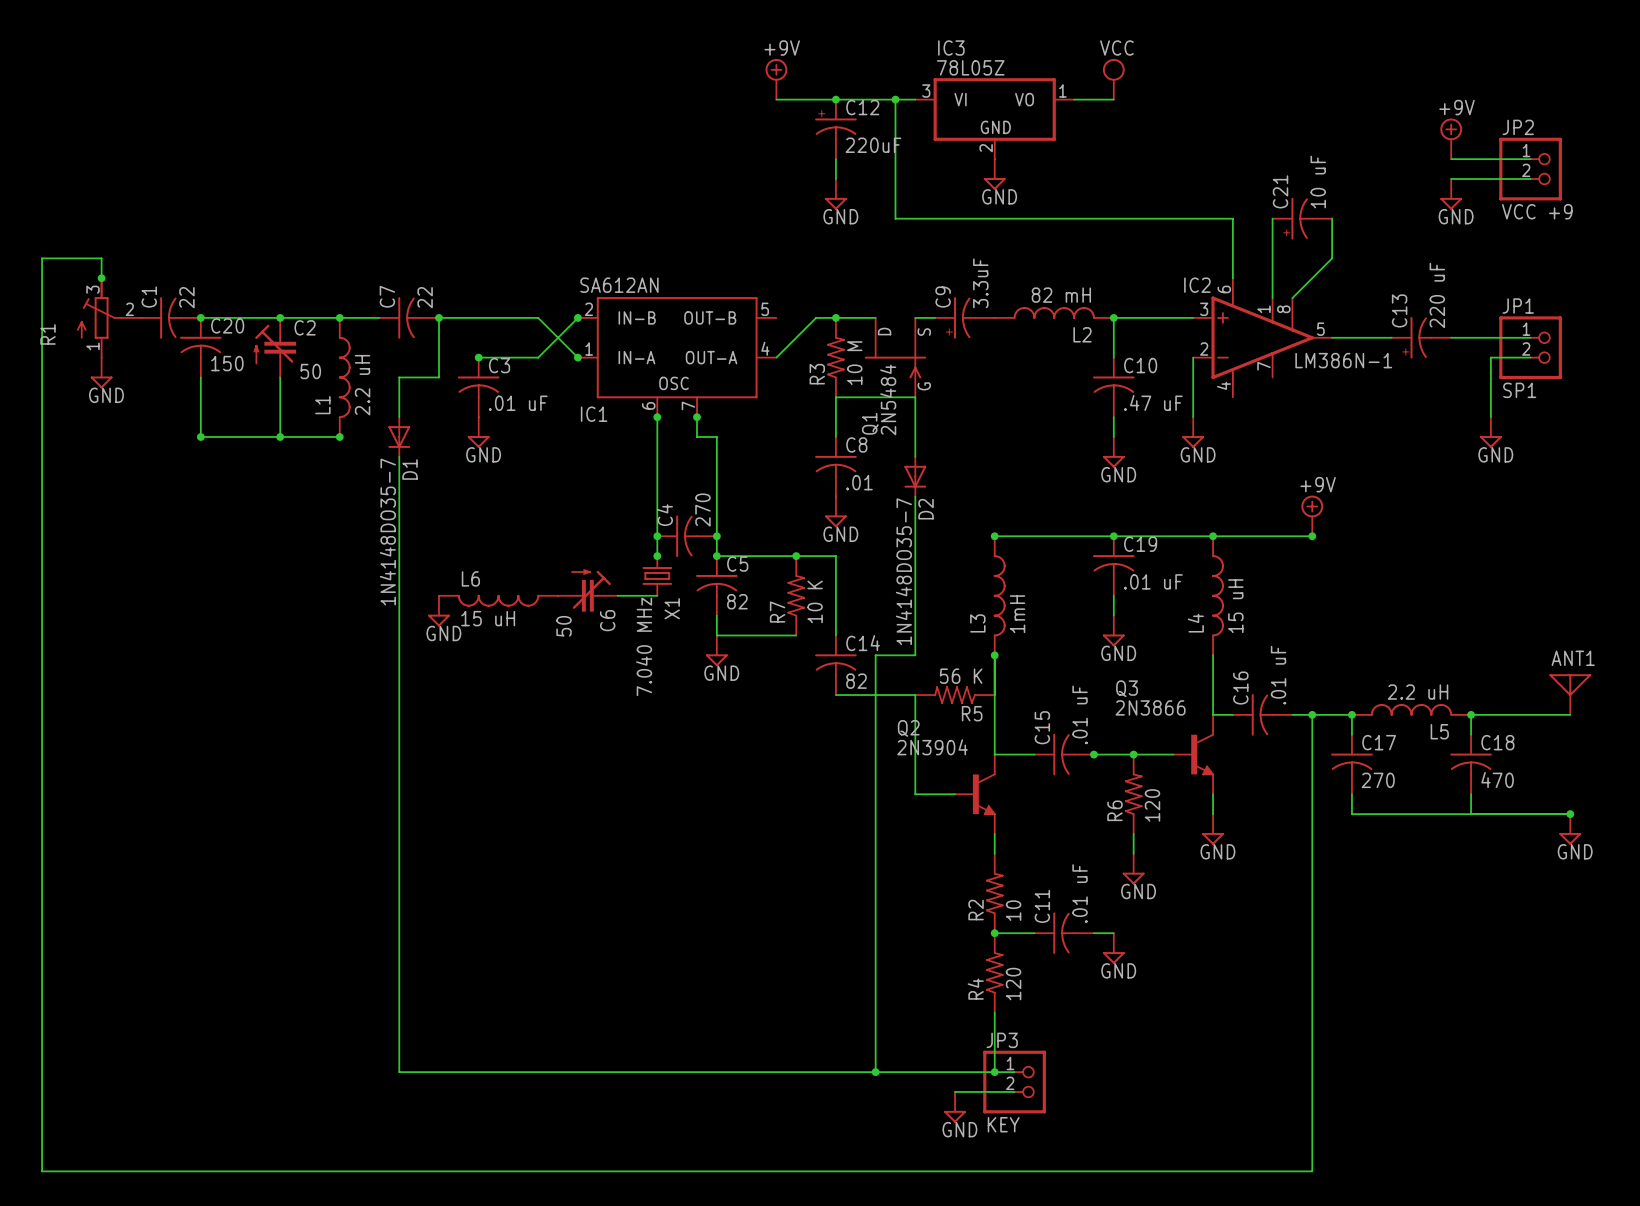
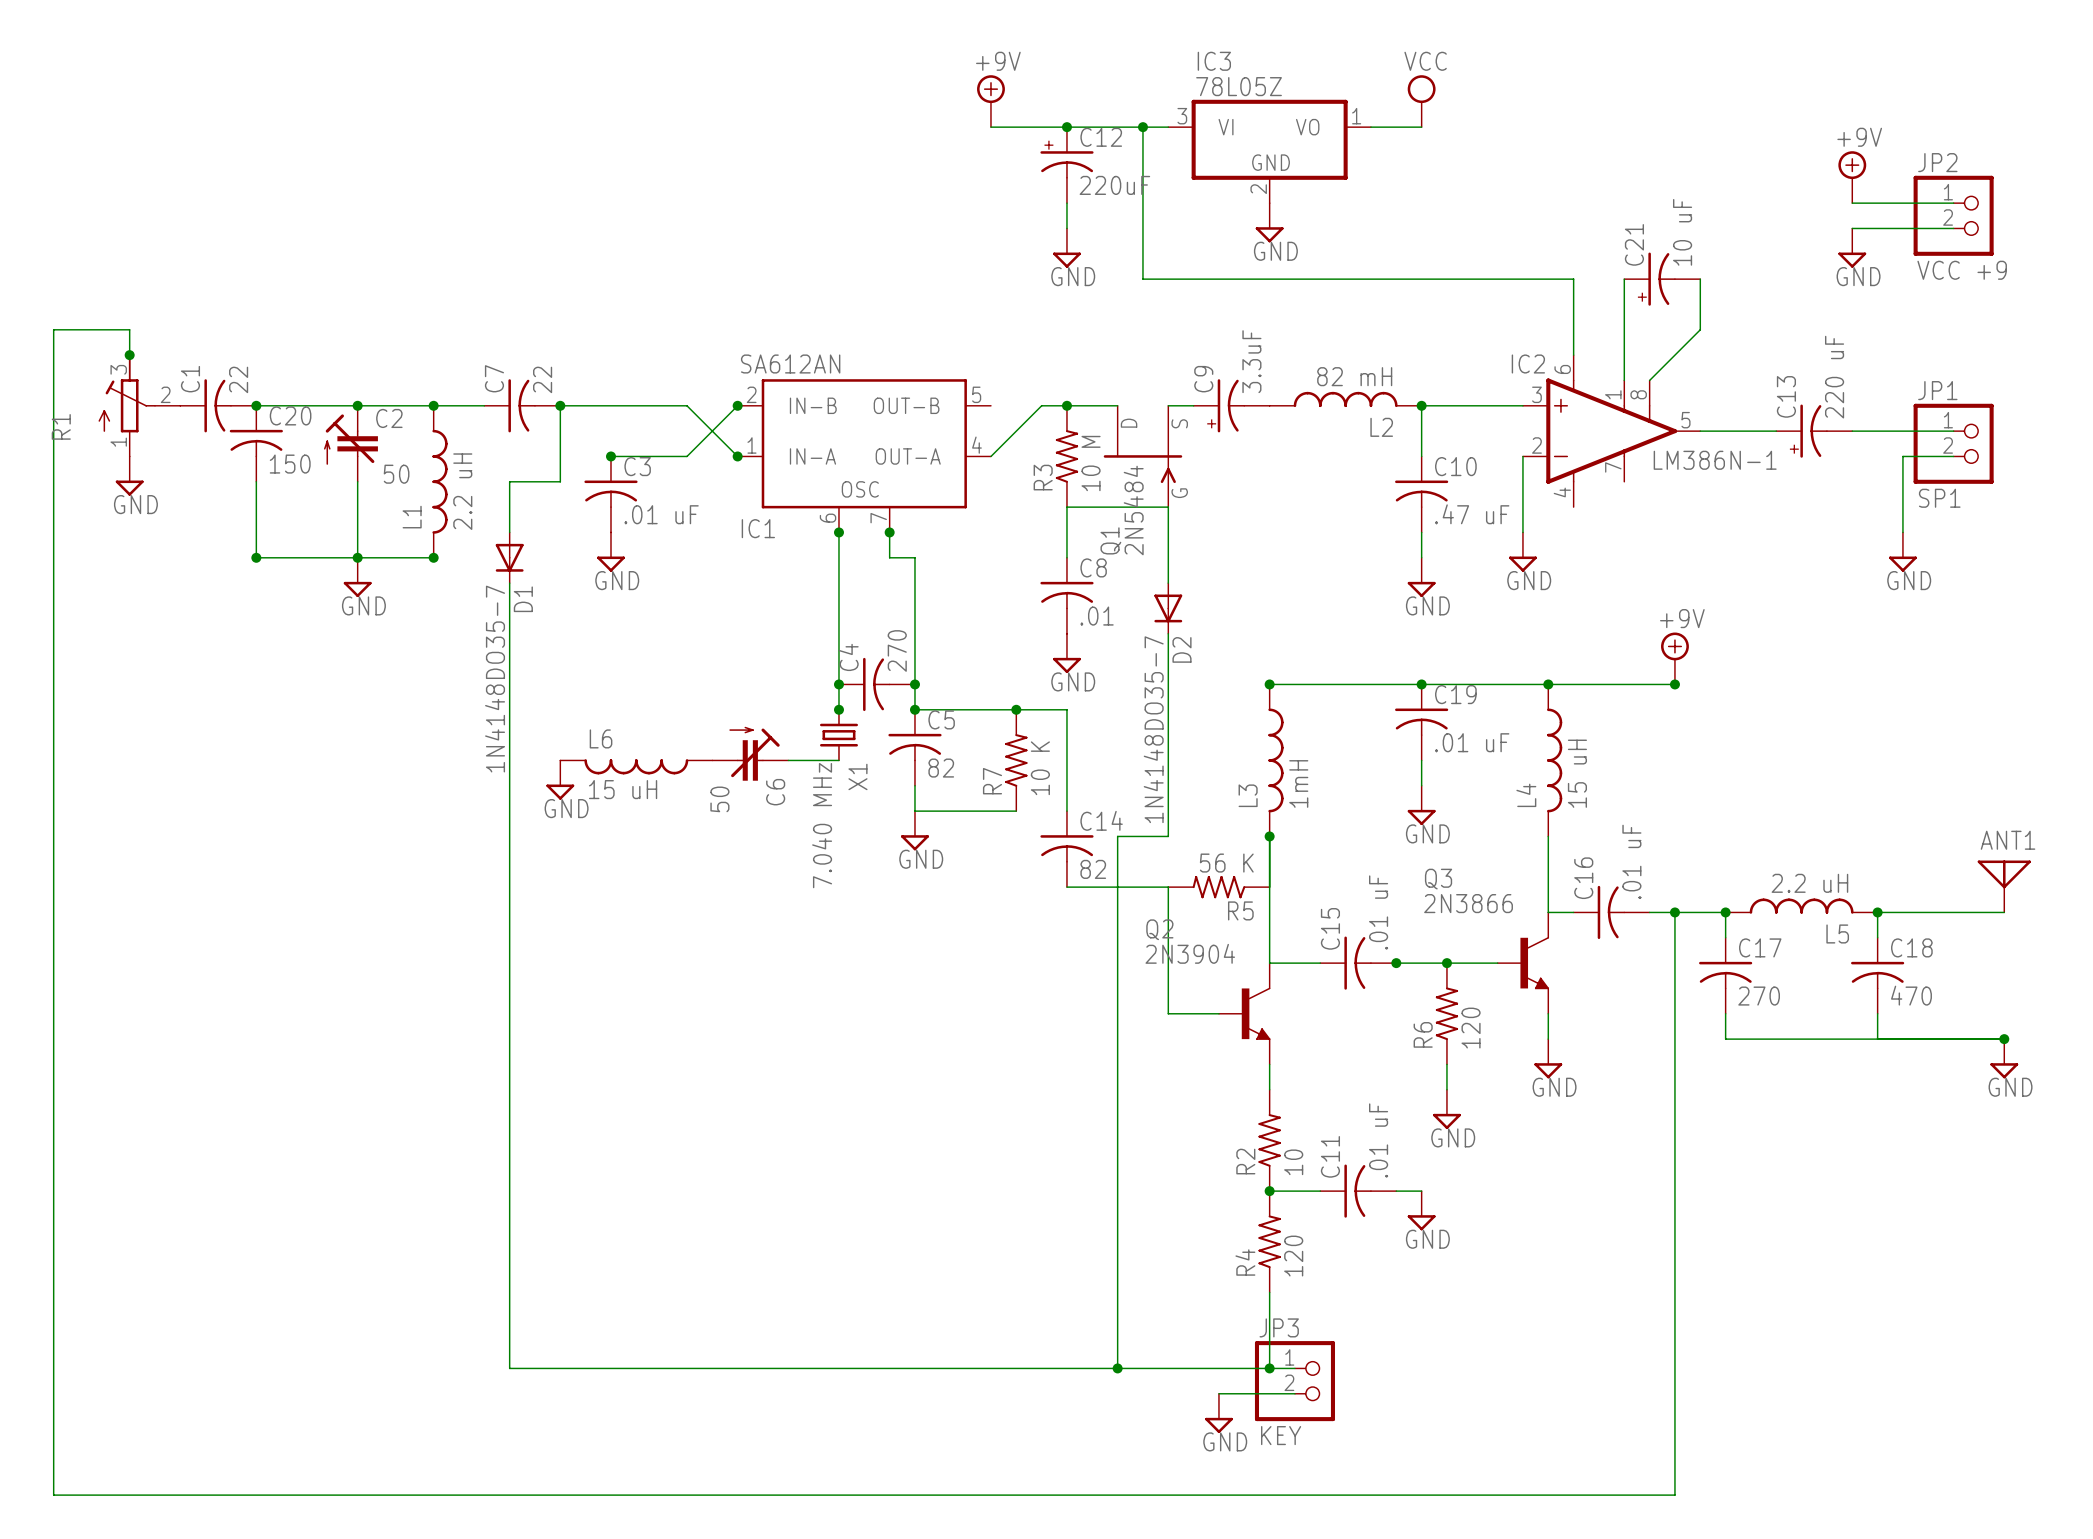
power symbol: none -> GND (357, 577)

